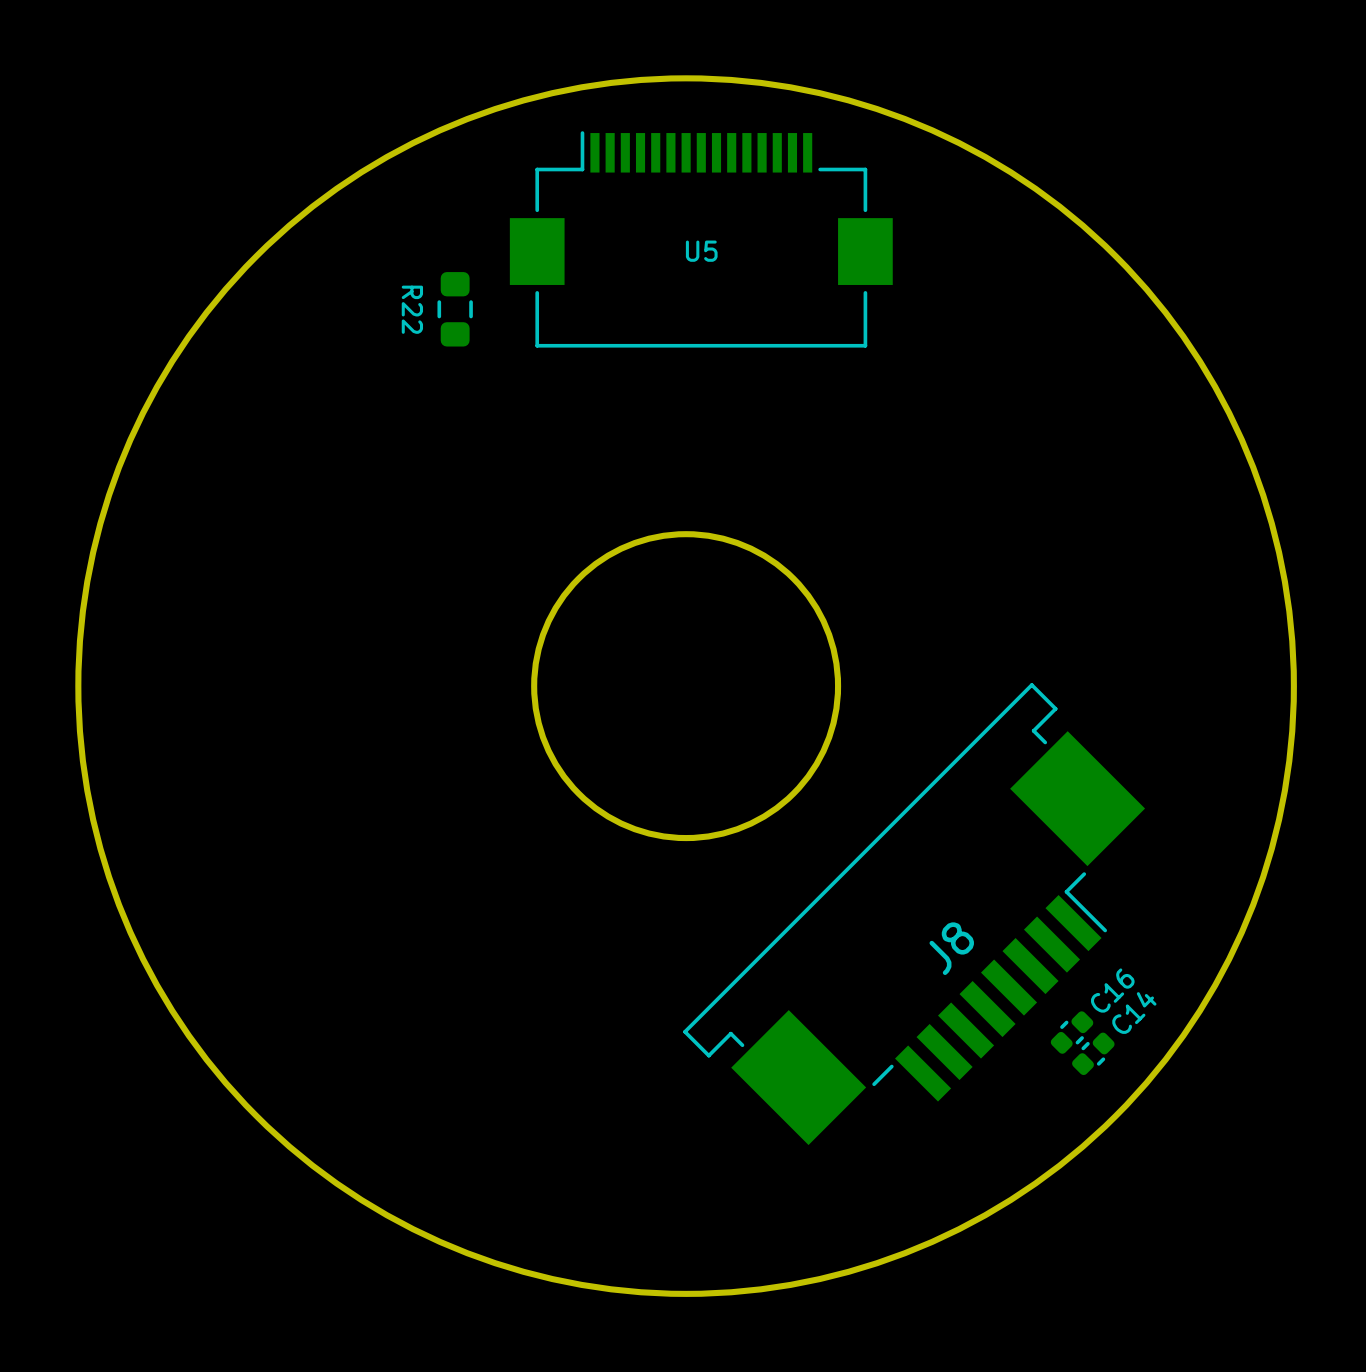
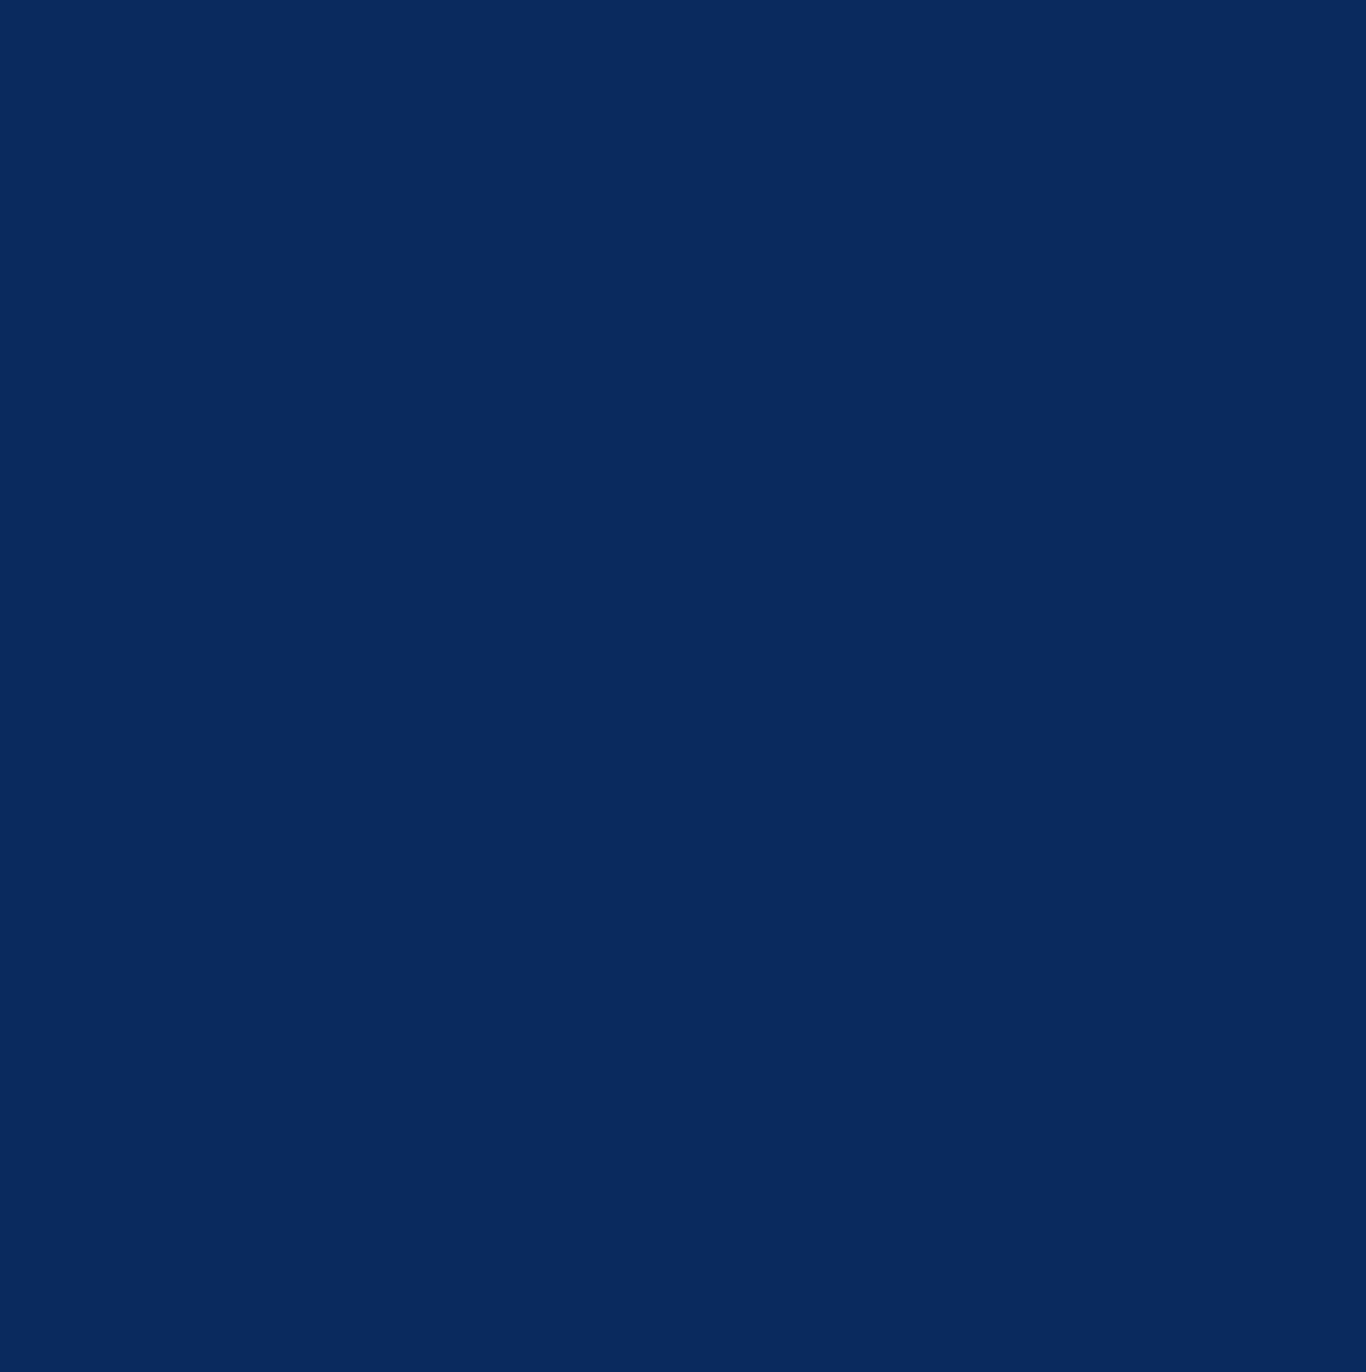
round board edge: [75, 75, 1297, 1297] -> none
U5: (701, 239) -> none
R22: (455, 309) -> none
round board edge: [531, 531, 842, 842] -> none
J8: (914, 914) -> none
C16: (1072, 1032) -> none
C14: (1093, 1053) -> none

